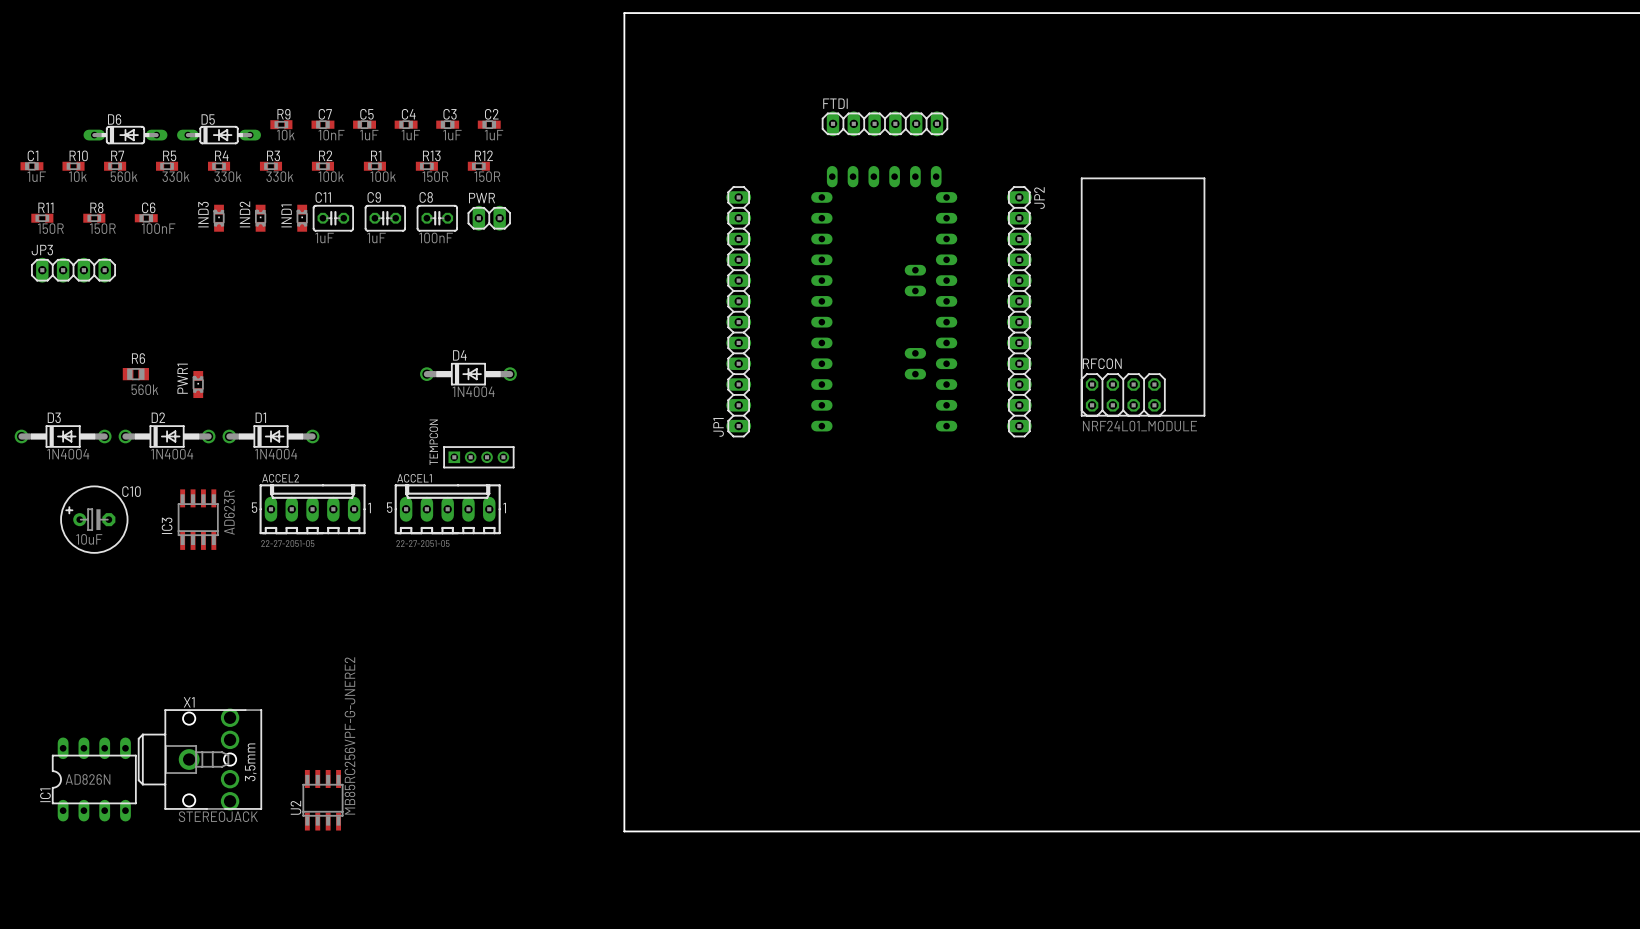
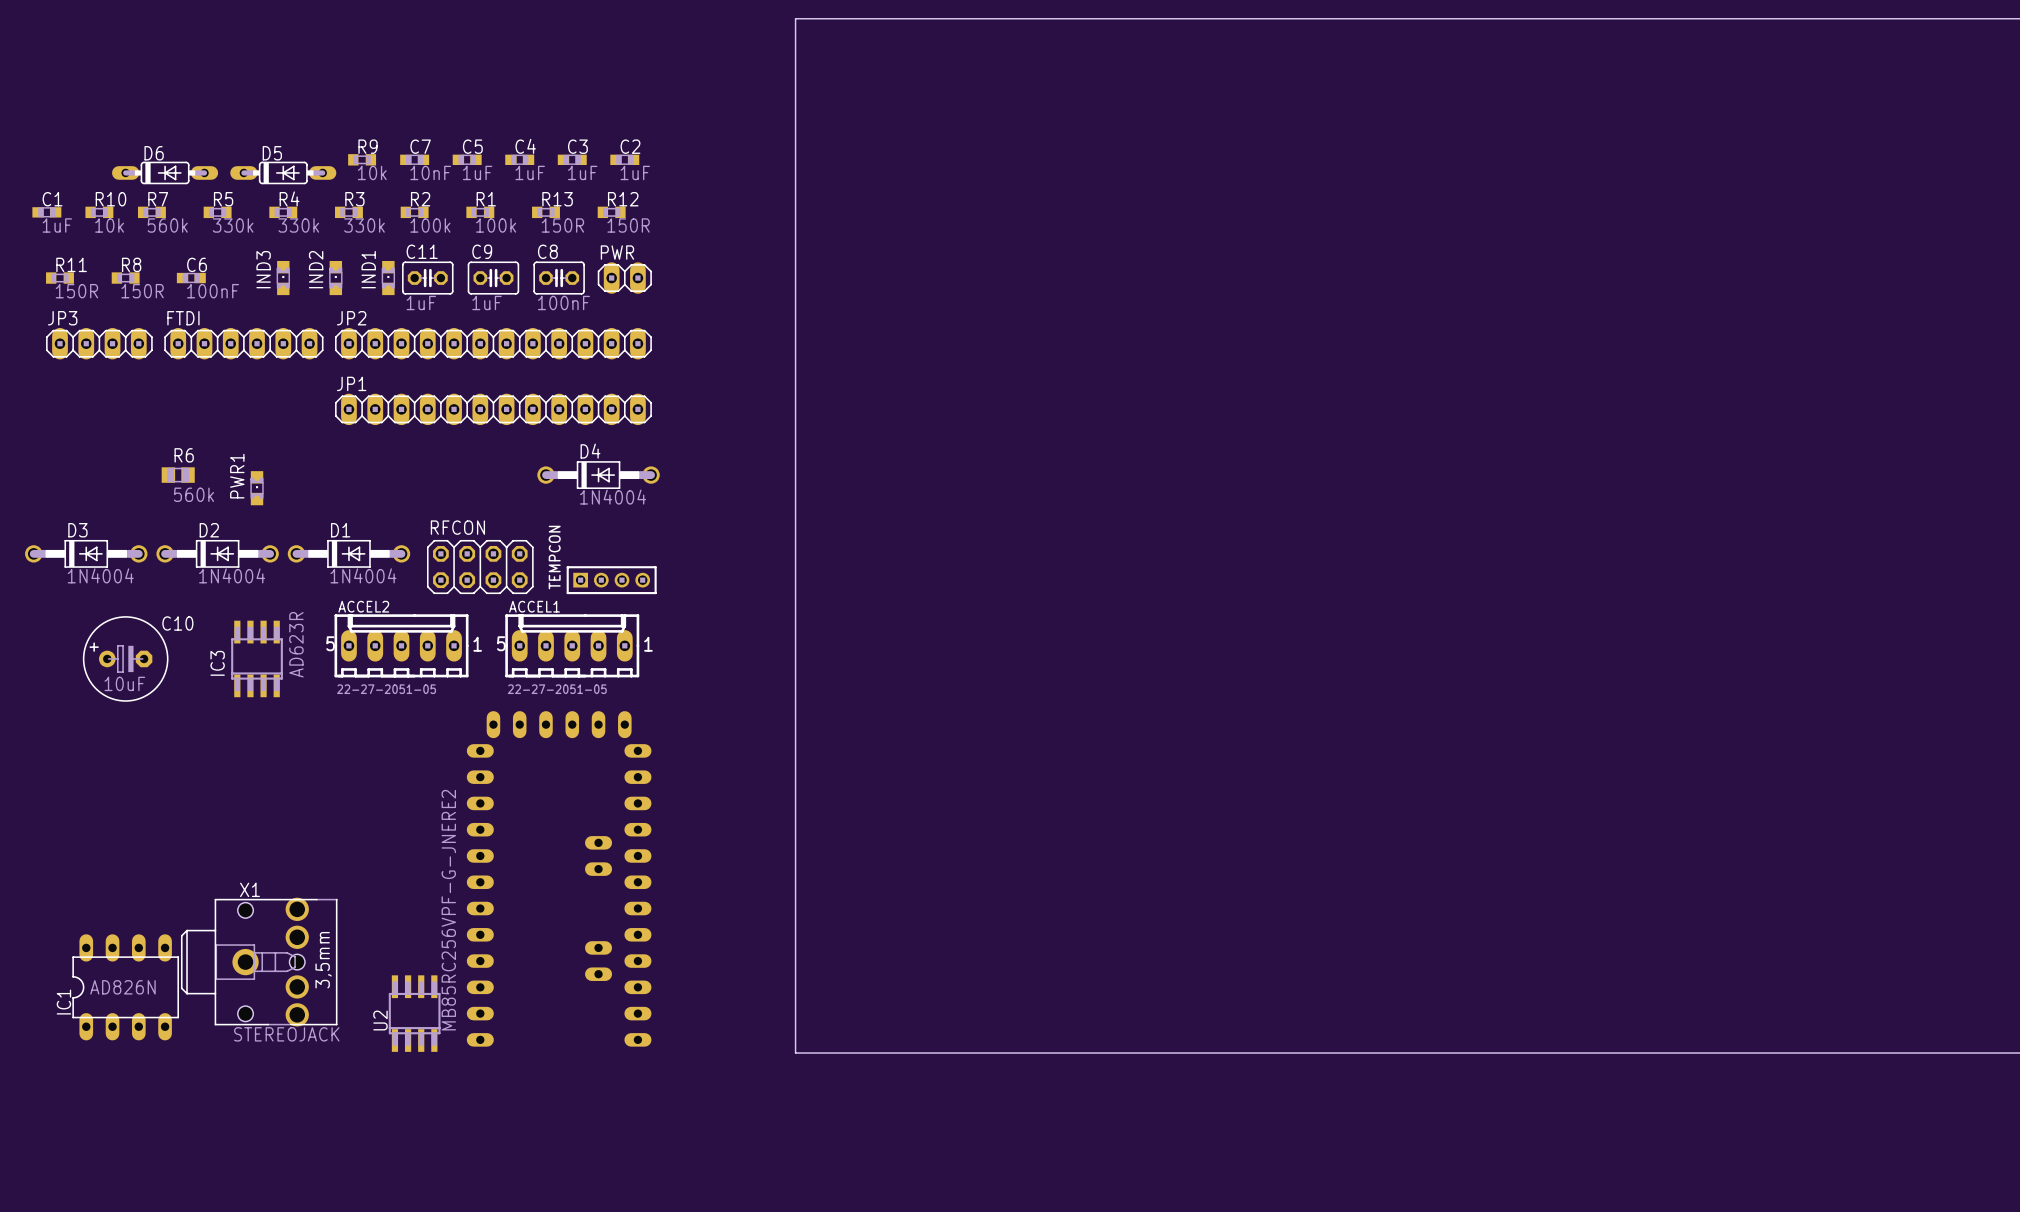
FTDI: (884, 123) -> none
JP2 name position: JP2 (1039, 198) -> JP2 (351, 318)
FTDI: none -> (243, 343)
RFCON: NRF24L01_MODULE (1143, 297) -> none
part: (884, 298) -> none
JP1 rotation: 0° (738, 311) -> 90° clockwise (493, 409)
JP1 position: (738, 311) -> (493, 409)
JP2 rotation: 0° (1019, 311) -> 90° clockwise (493, 343)
JP2 position: (1019, 311) -> (493, 343)
RFCON: none -> (480, 567)
part: none -> (559, 878)

